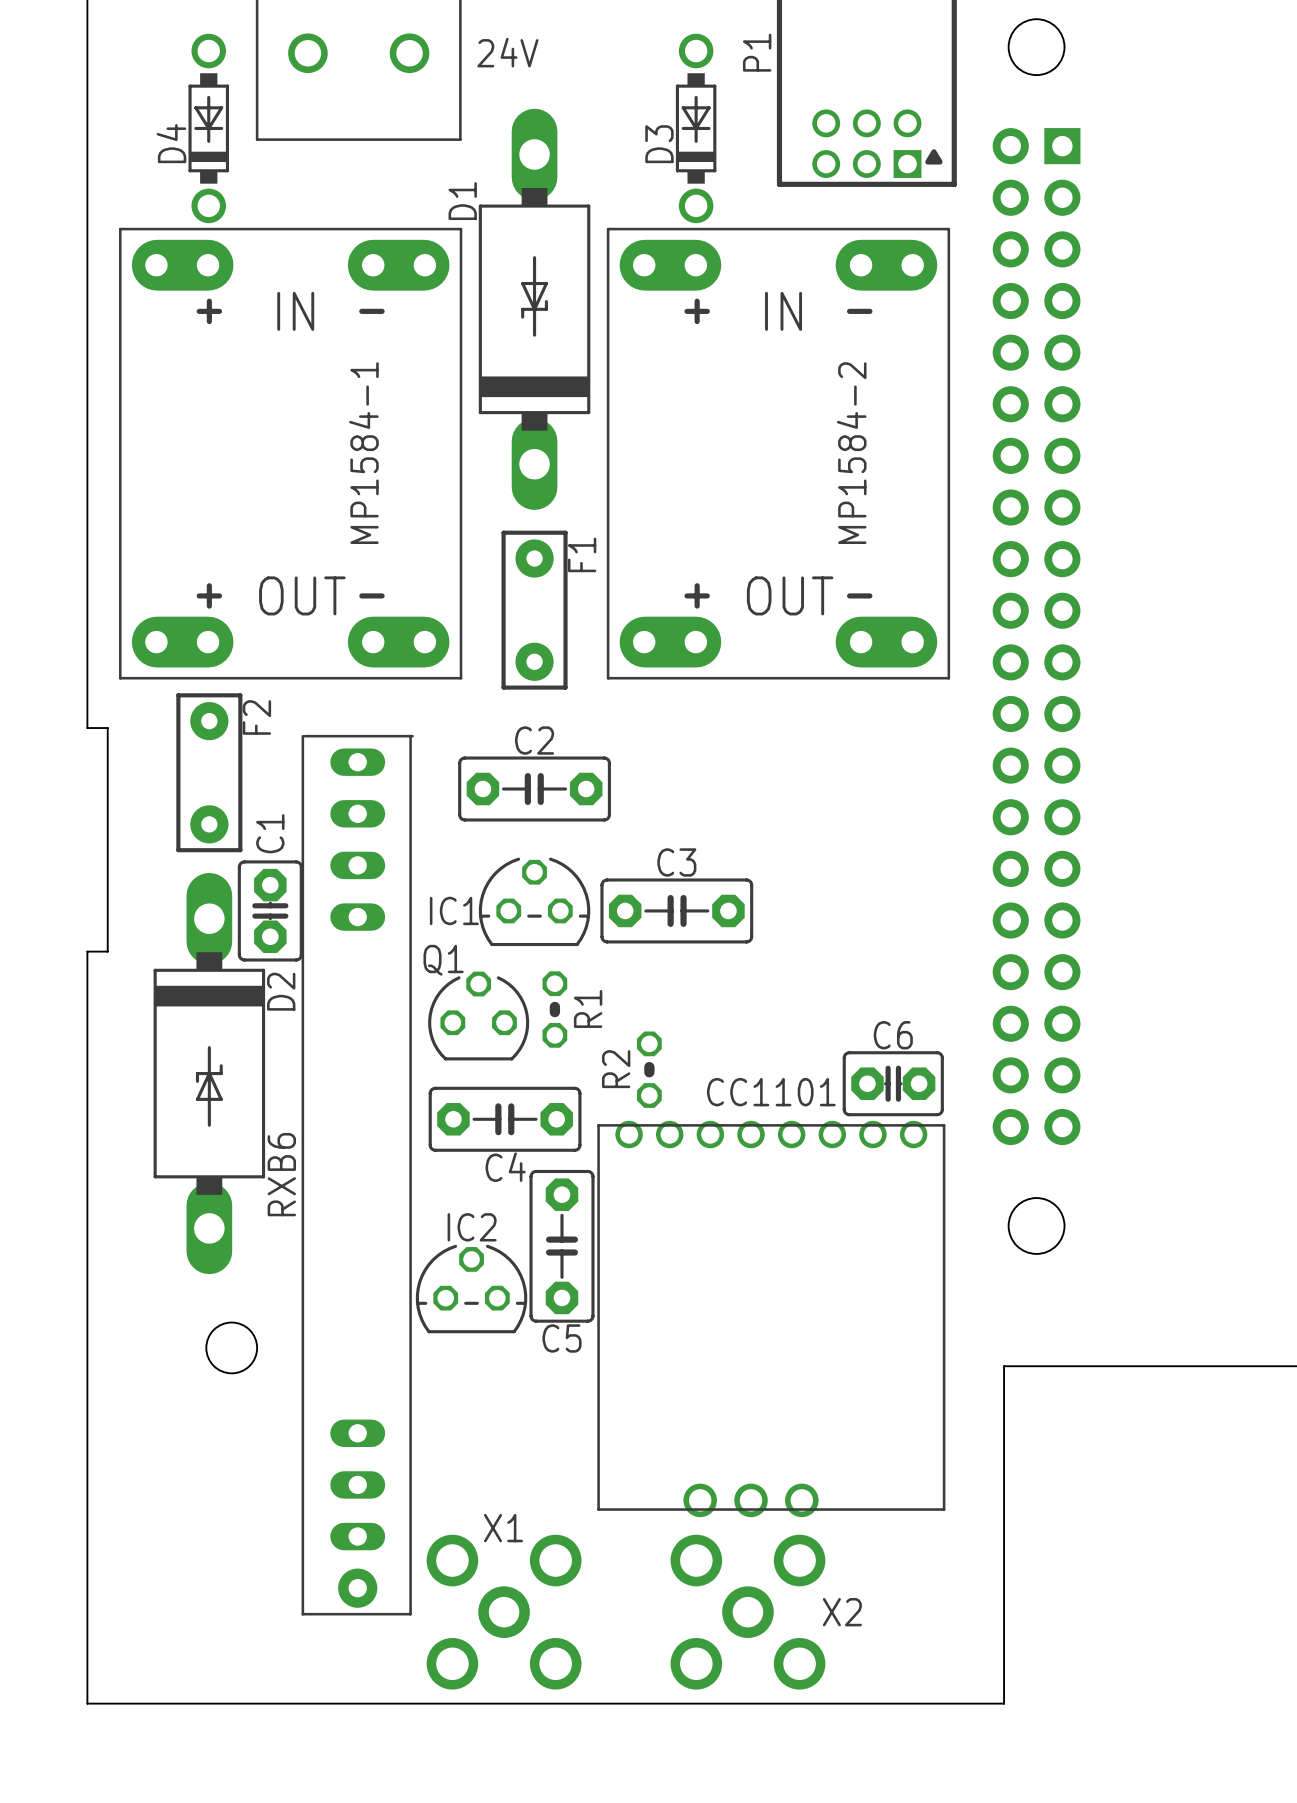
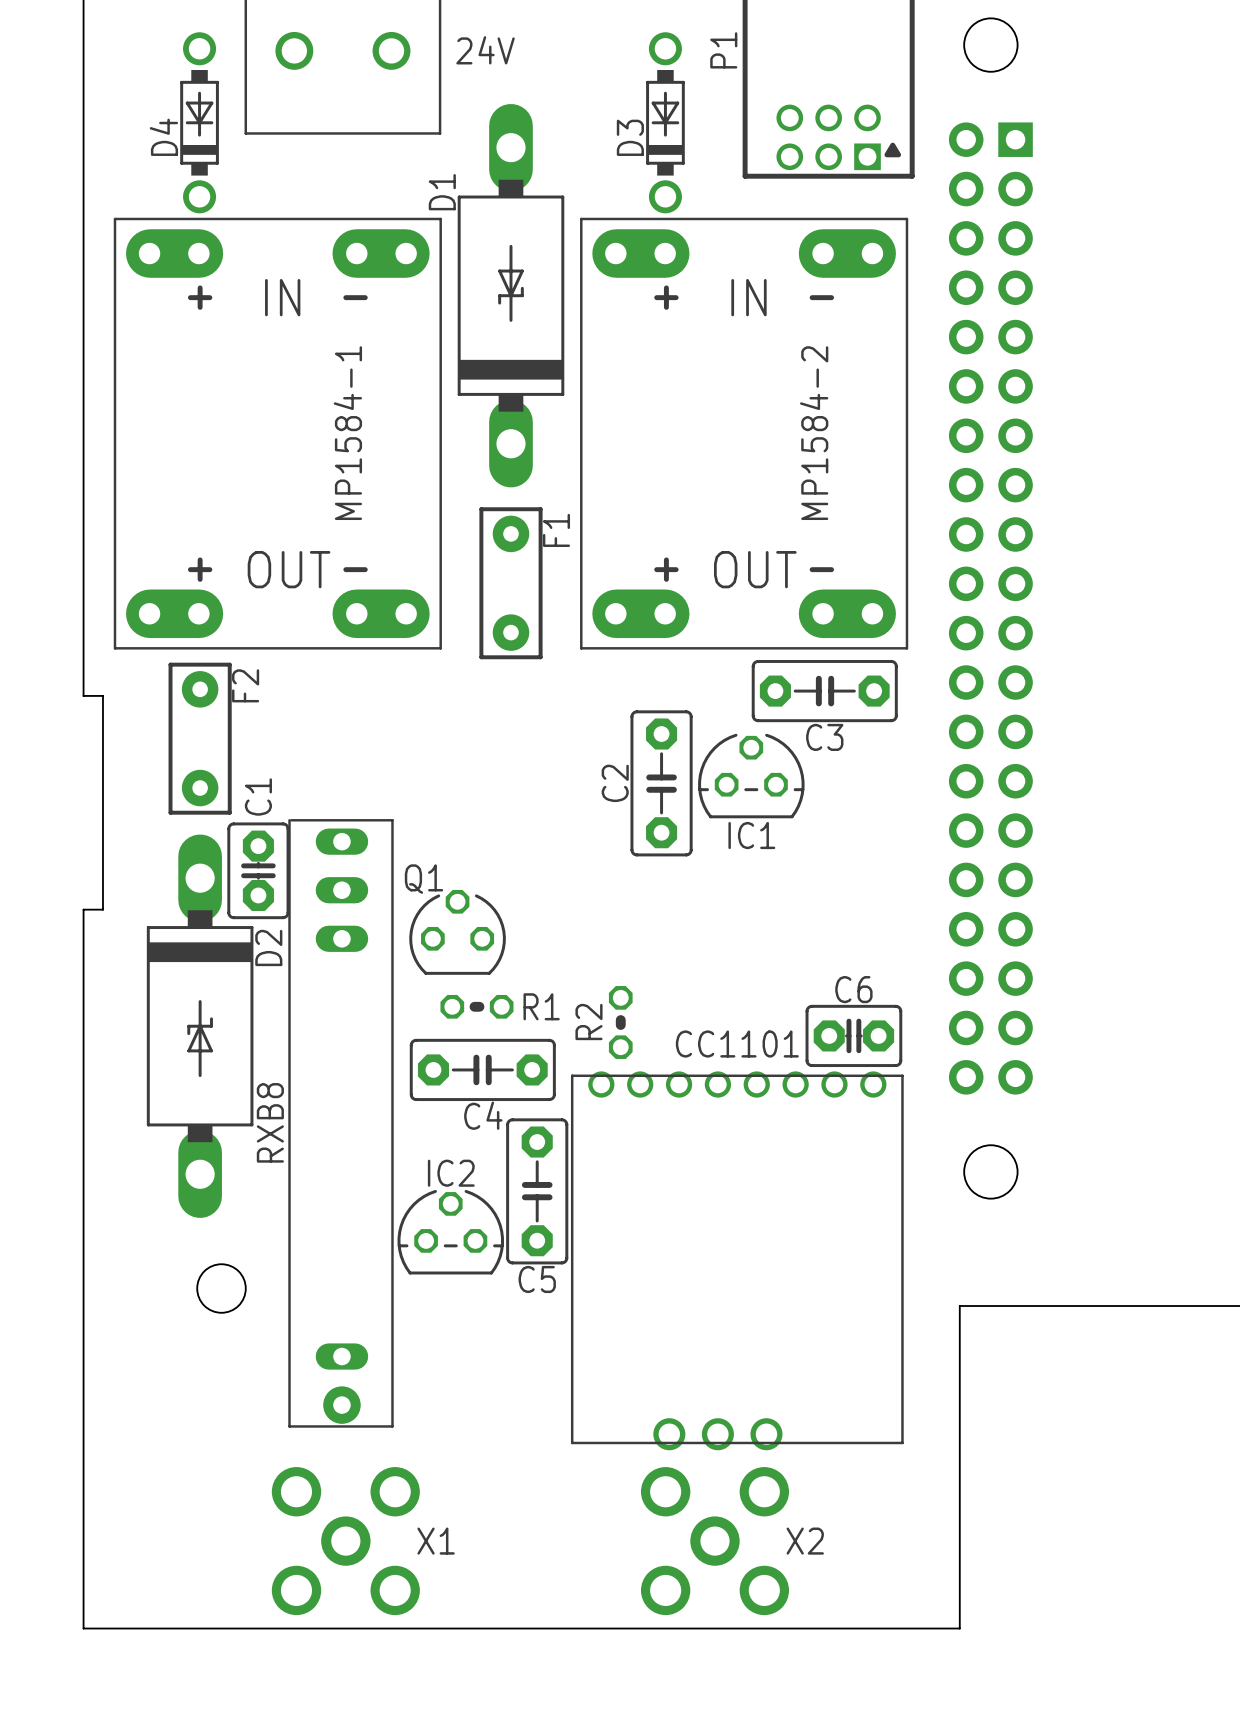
C2 rotation: 0° (534, 789) -> 90° counterclockwise (661, 783)
C2 position: (534, 789) -> (661, 783)
C3 name position: C3 (676, 862) -> C3 (824, 737)
IC1 position: (534, 901) -> (751, 776)
IC1 name position: IC1 (454, 910) -> IC1 (751, 835)
C3 position: (676, 910) -> (824, 691)
R1 rotation: 0° (554, 1009) -> 90° clockwise (476, 1006)
R1 position: (554, 1009) -> (476, 1006)
Q1 position: (478, 1016) -> (457, 932)
RXB8: none -> (340, 1123)
RXB6: (357, 1175) -> none
X1 name position: X1 (503, 1528) -> X1 (436, 1541)
X1 position: (504, 1612) -> (345, 1541)

